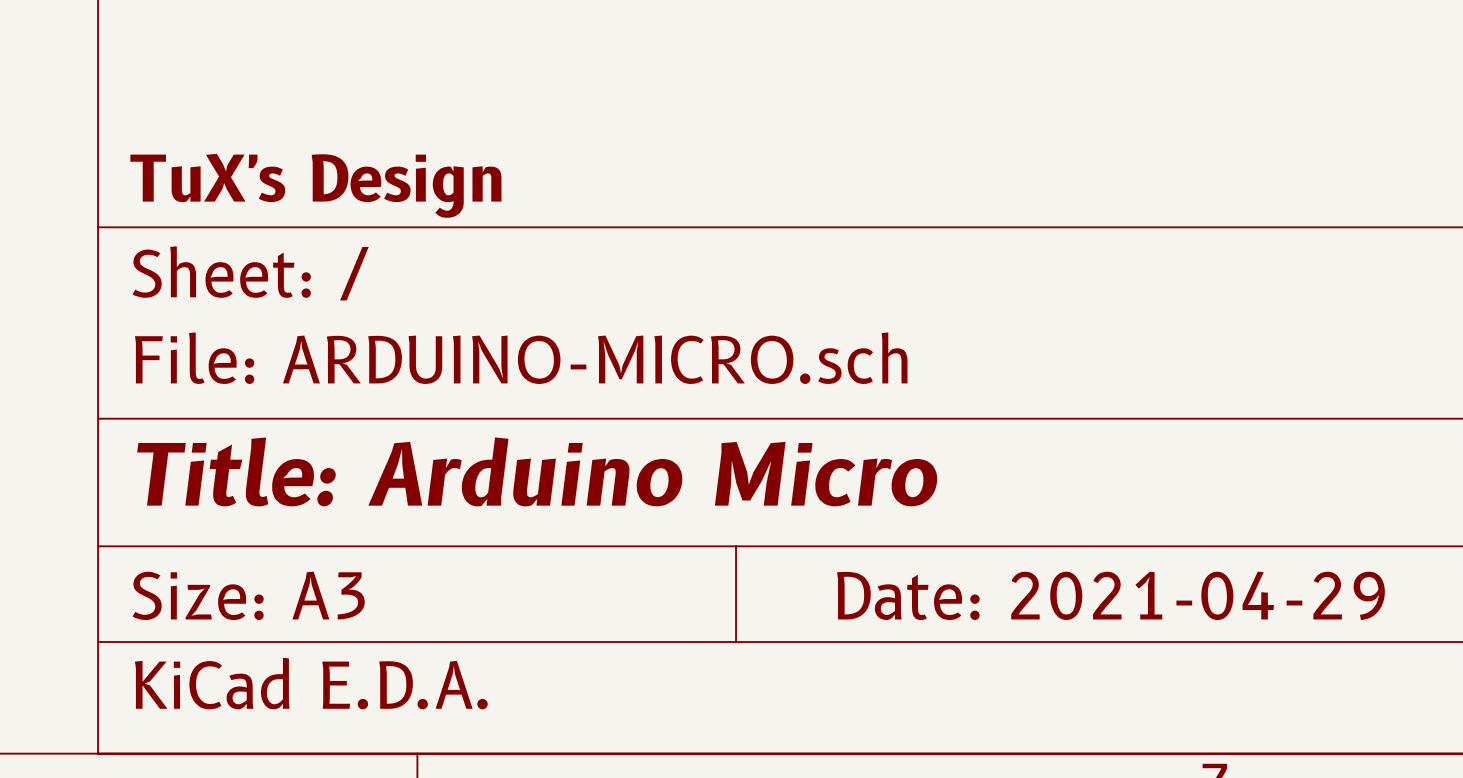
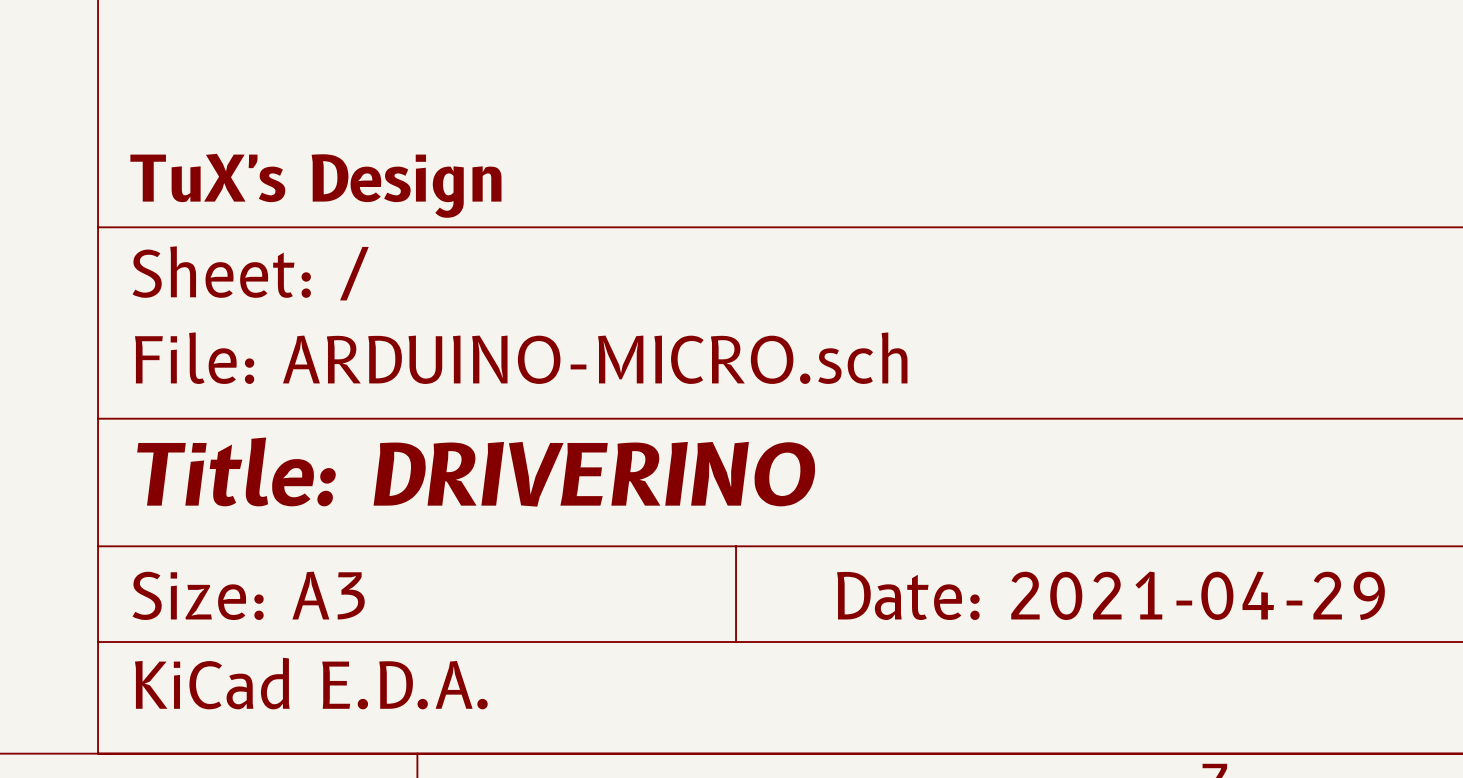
title block: Title: Arduino Micro (537, 471) -> Title: DRIVERINO (476, 472)

